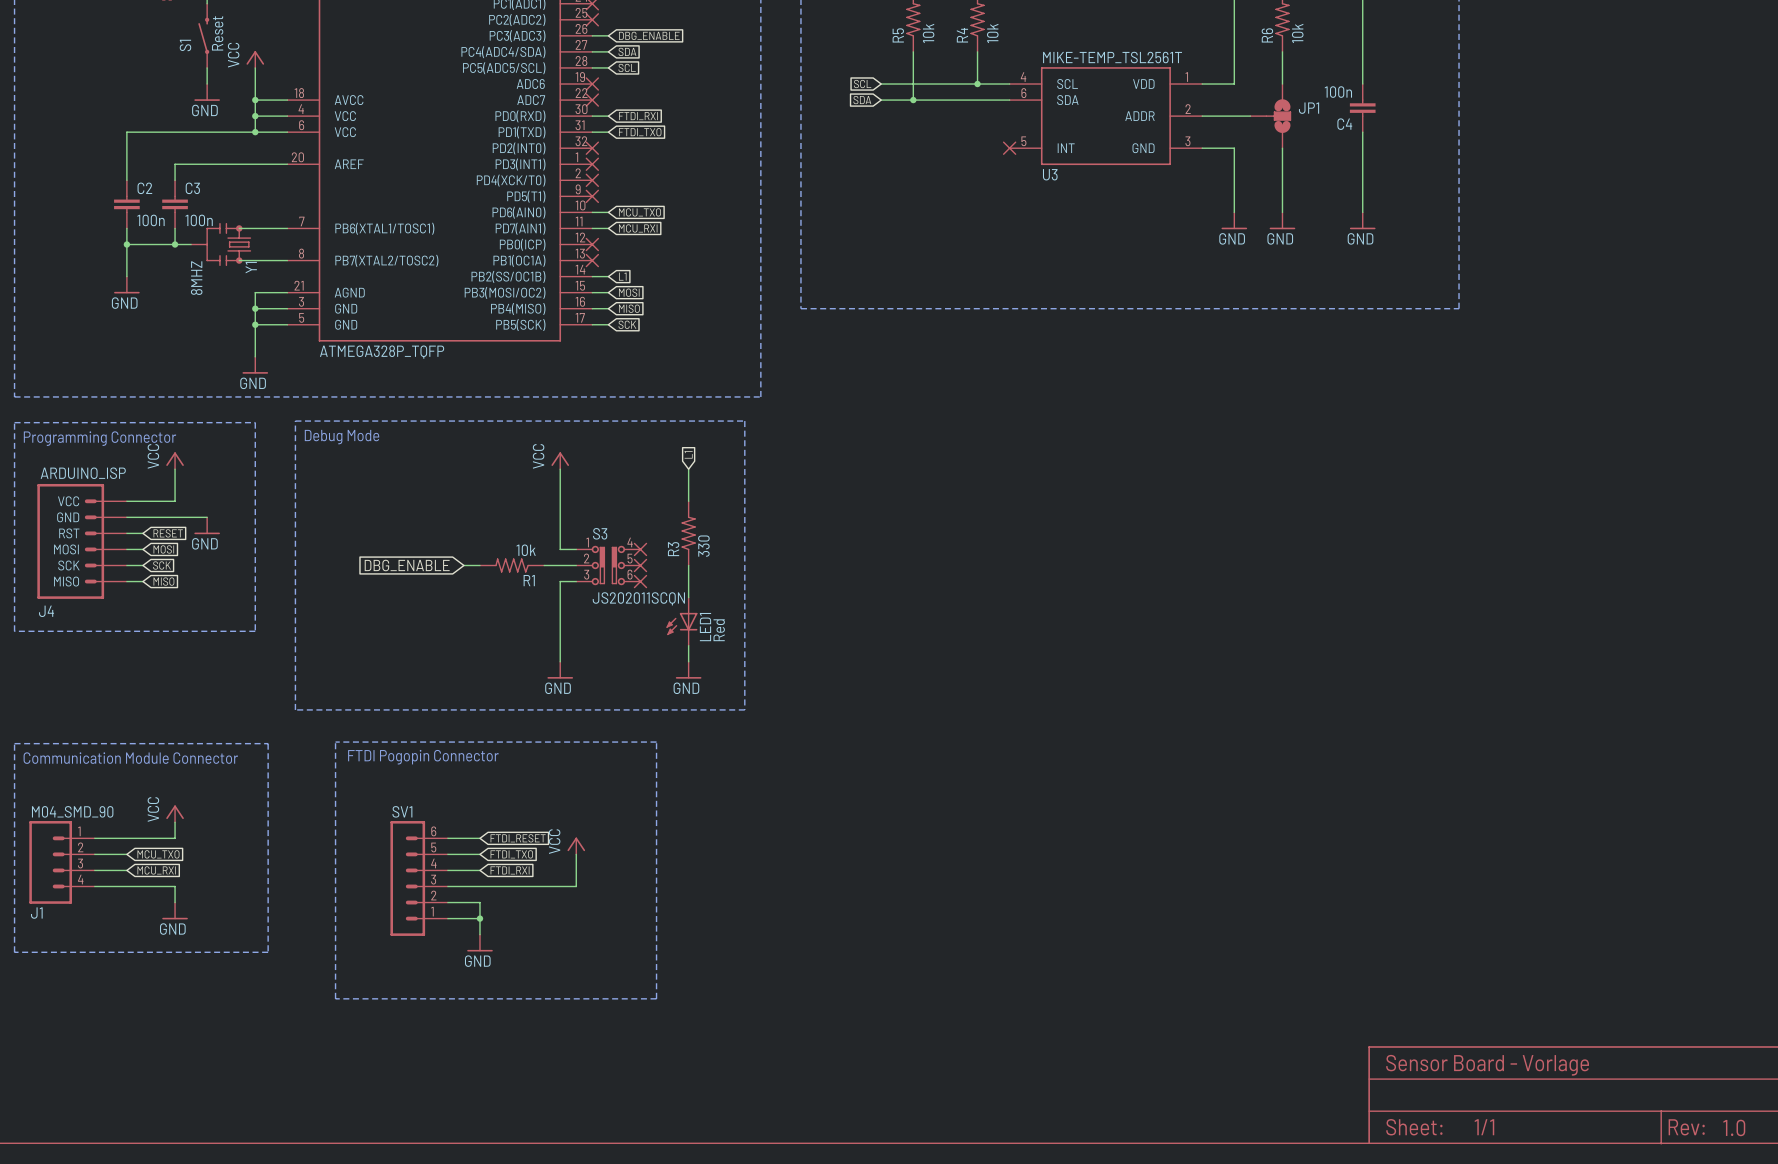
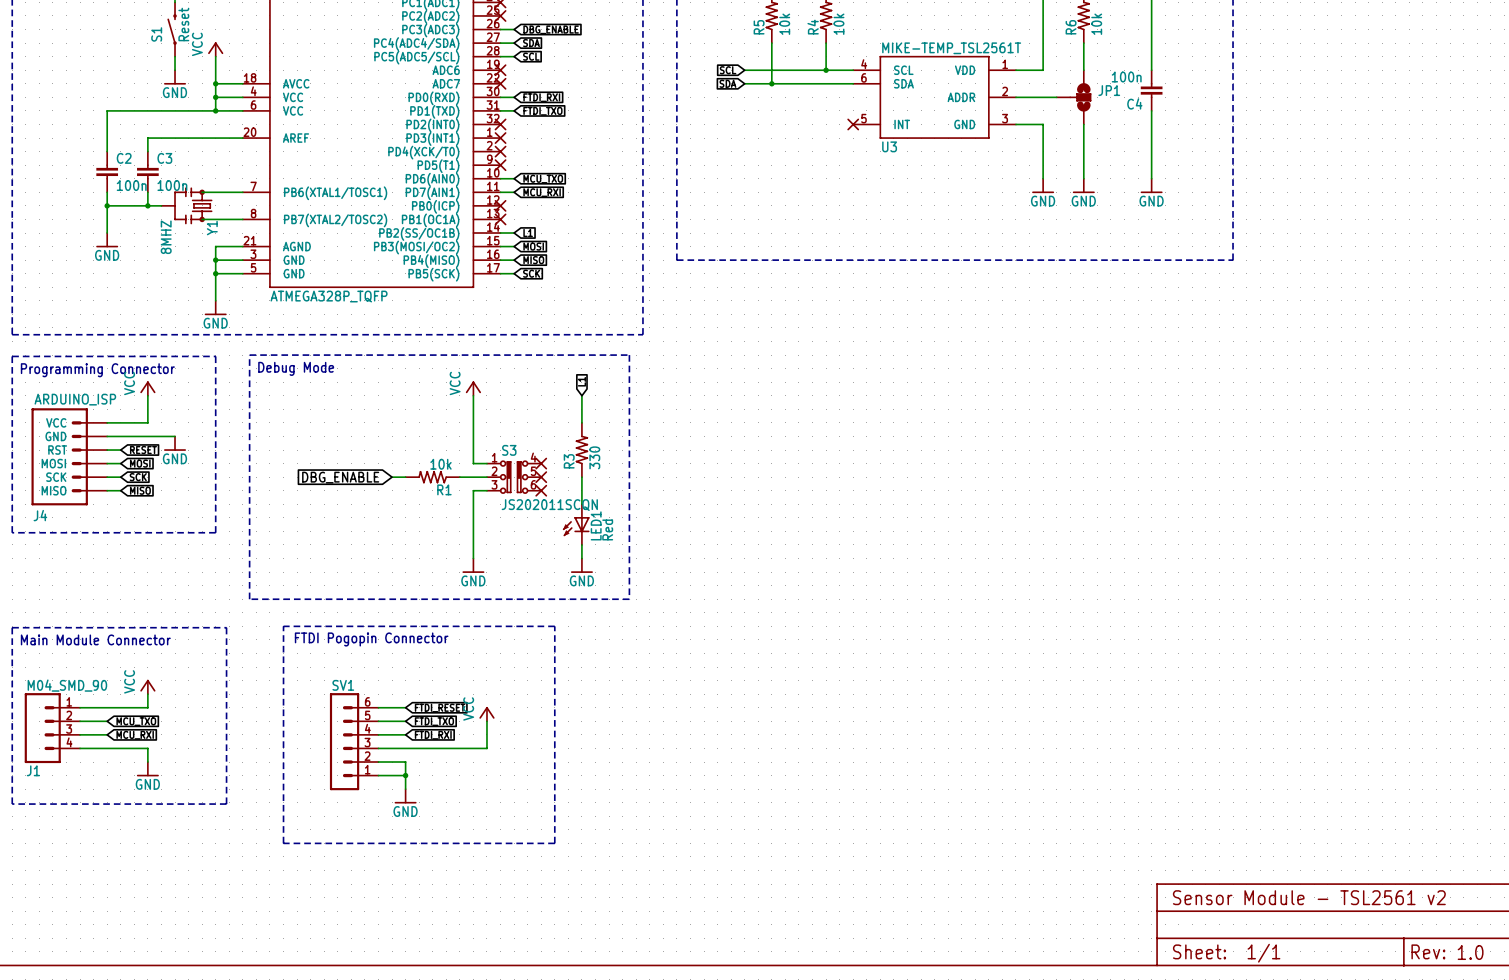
text: Communication Module Connector (130, 758) -> Main Module Connector (95, 639)
text: Sensor Board - Vorlage (1487, 1065) -> Sensor Module - TSL2561 v2 (1309, 897)

